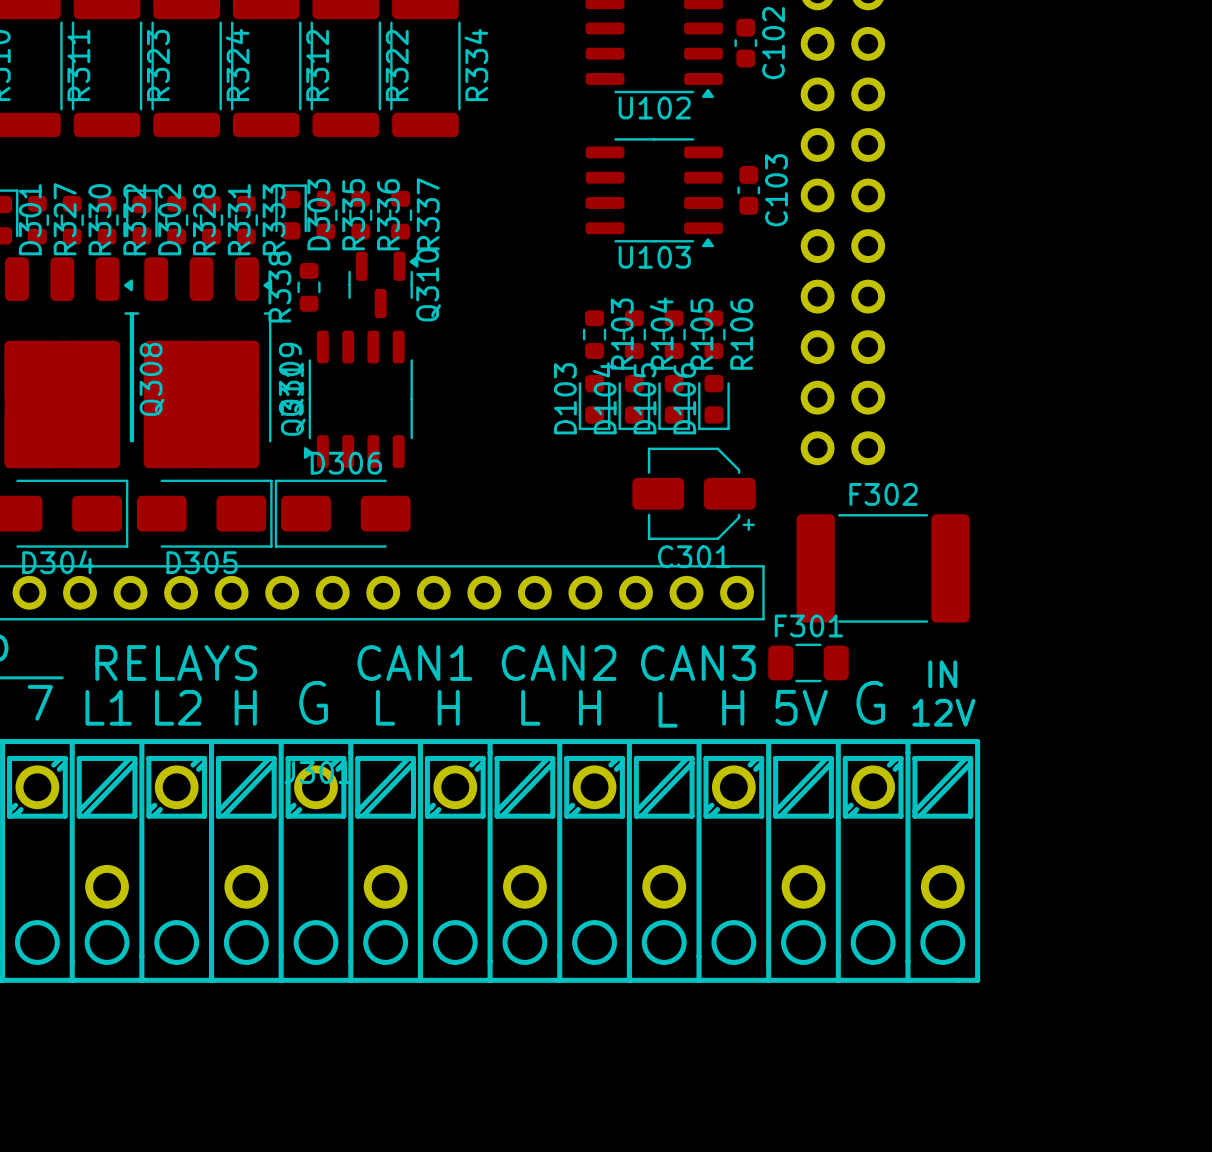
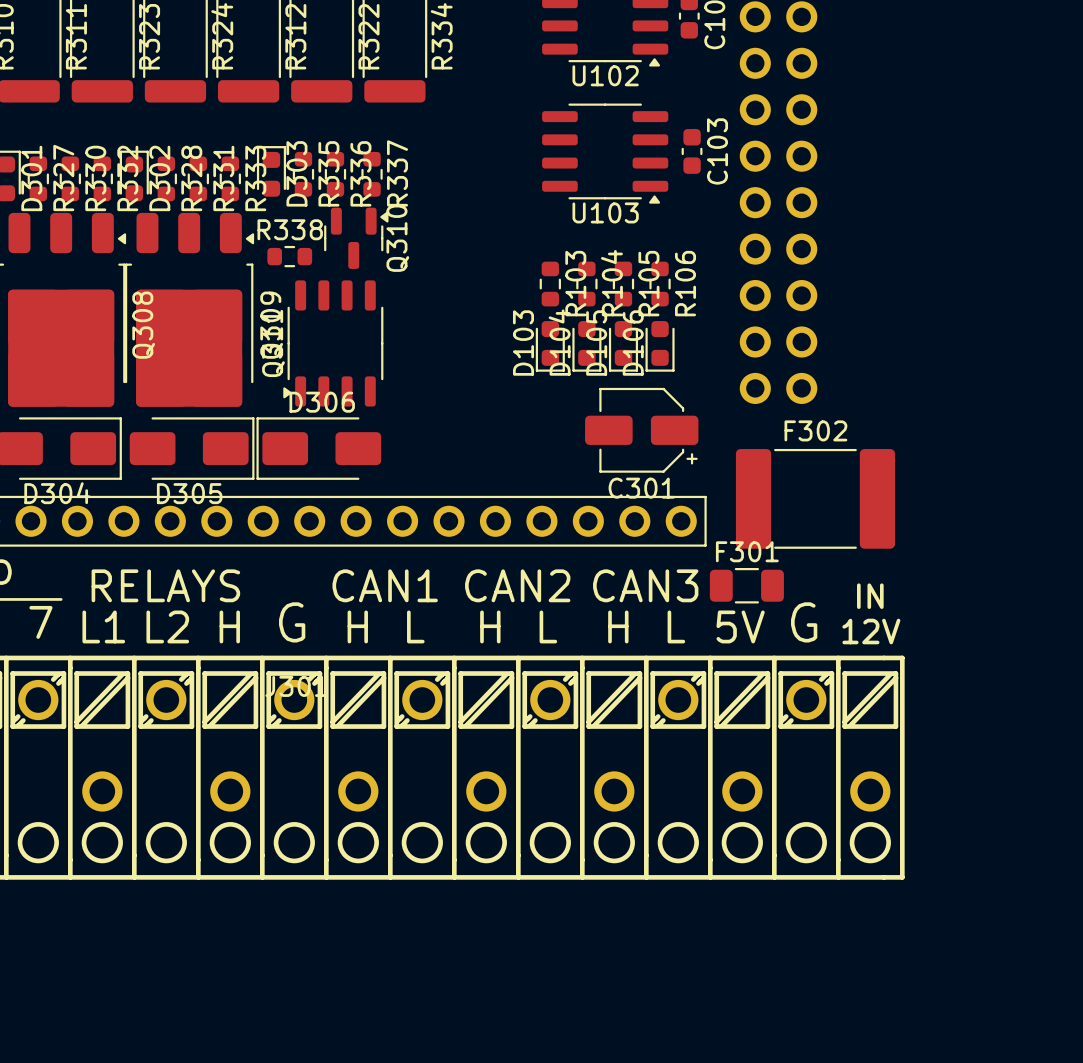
R338 rotation: 0° (309, 287) -> 90° clockwise (289, 256)
text: L (385, 707) -> H (357, 626)
text: H (448, 707) -> L (415, 626)
text: L (530, 707) -> H (490, 626)
text: H (589, 707) -> L (548, 626)
text: H (733, 707) -> L (676, 626)
text: L (668, 709) -> H (618, 626)

